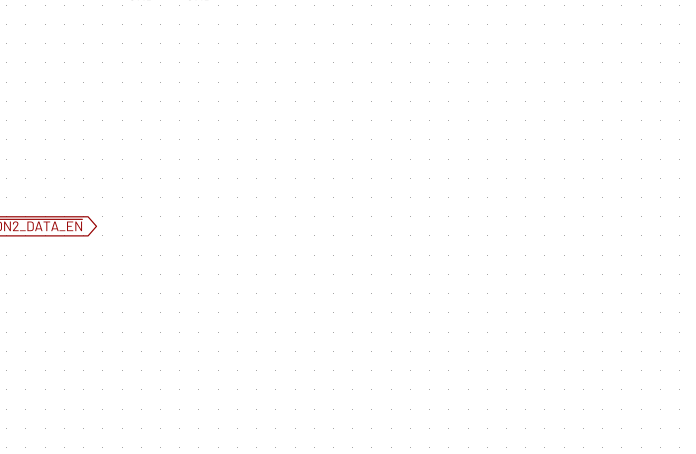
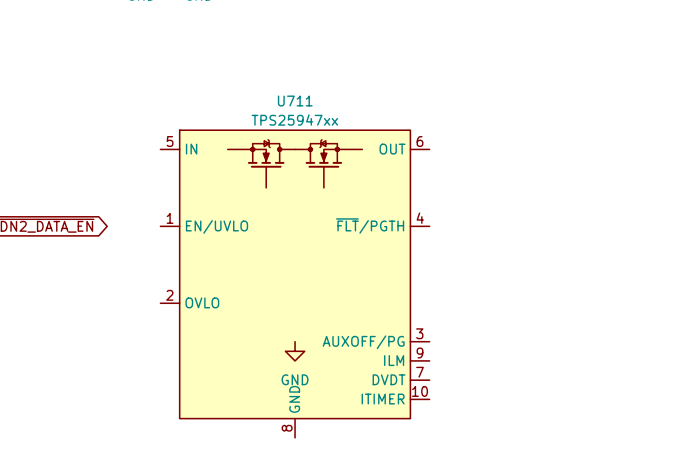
U711: none -> TPS25947xx (295, 284)
power symbol: none -> GND (295, 351)

